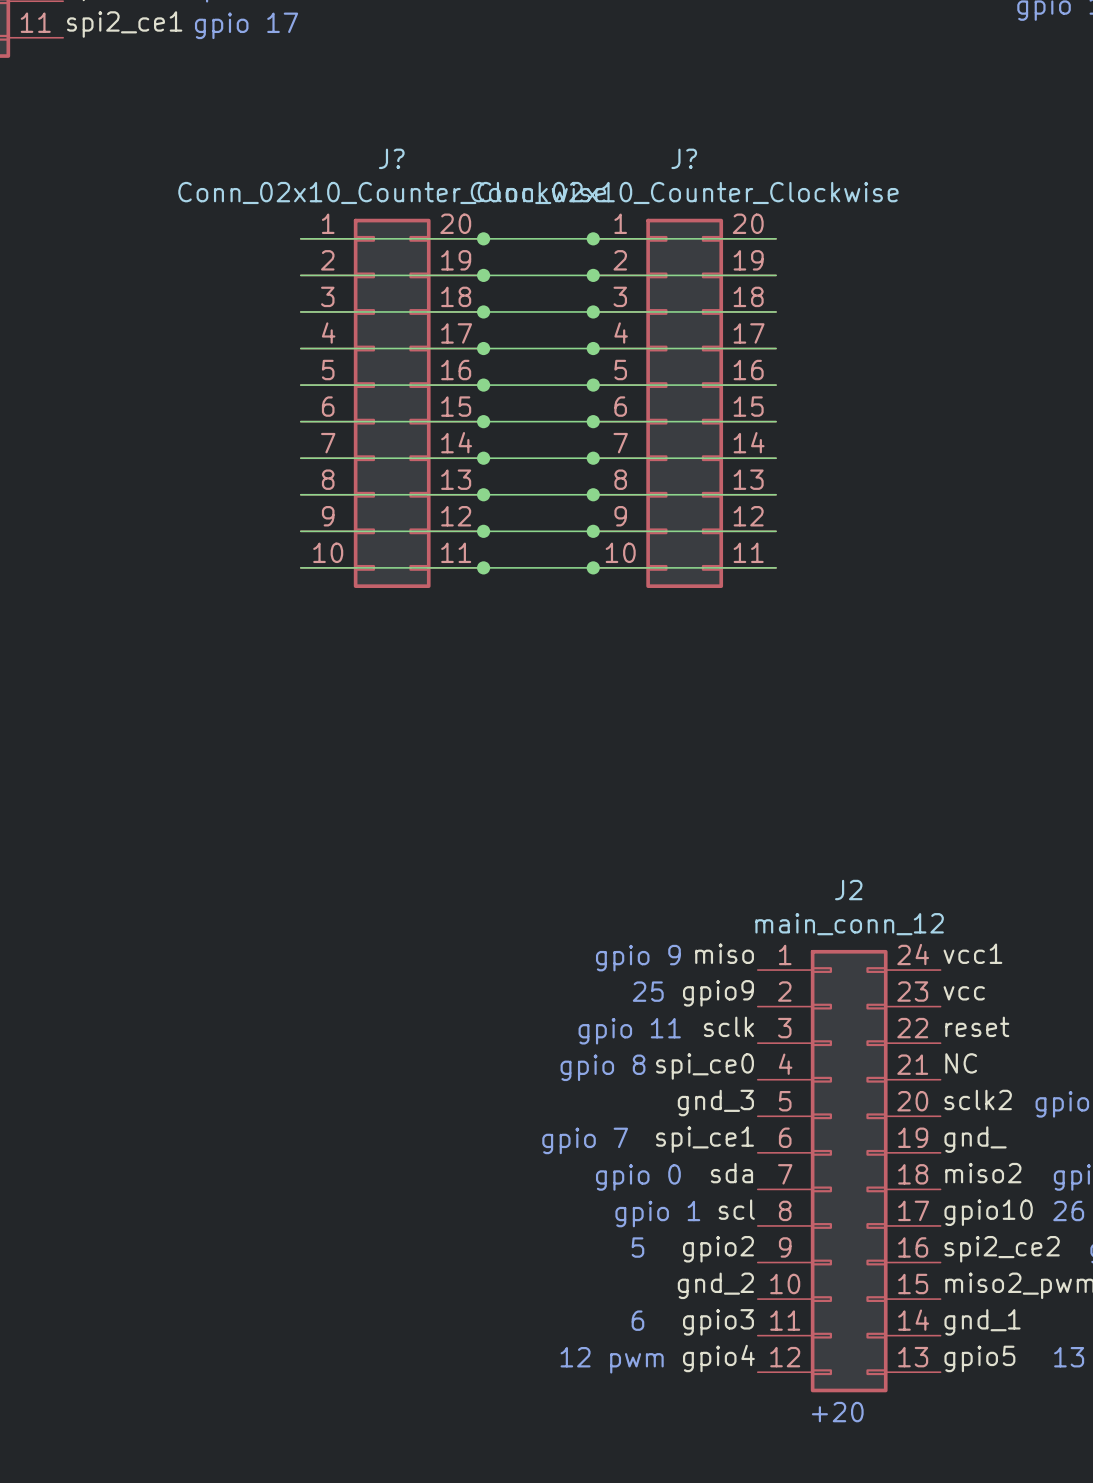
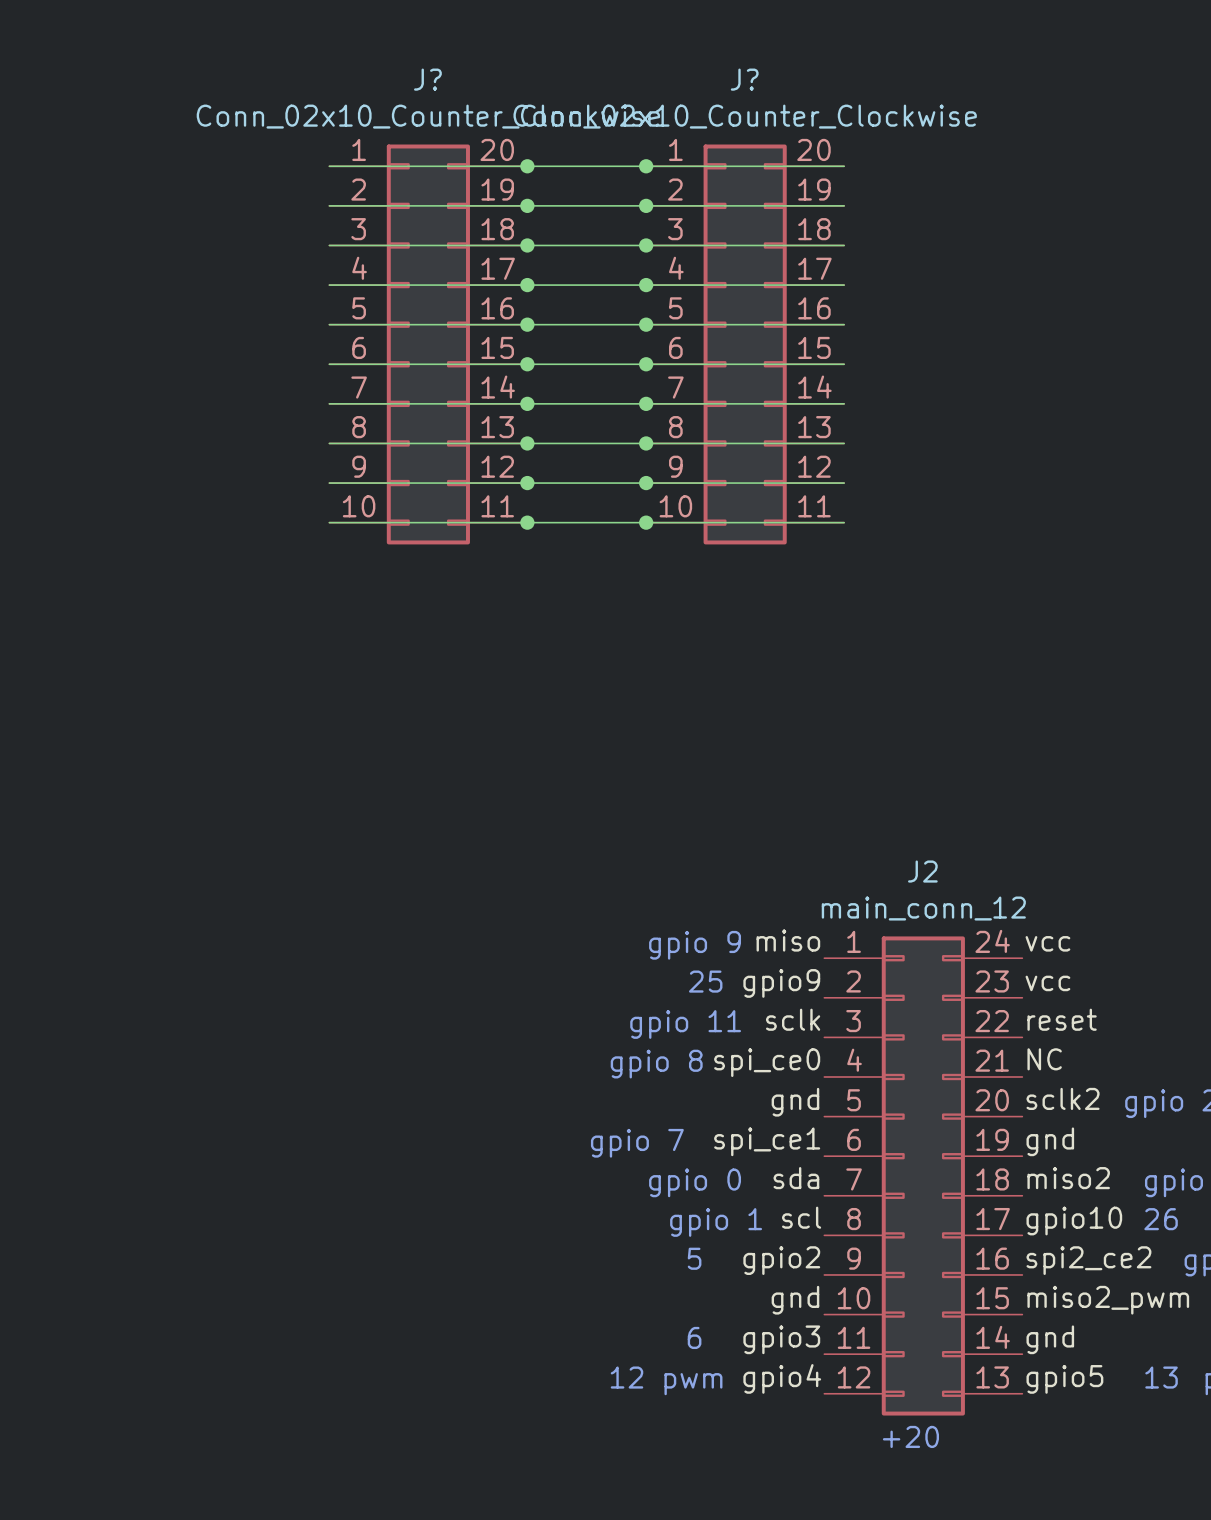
label: vcc1 (972, 953) -> vcc (1047, 943)
label: gnd_3 (715, 1103) -> gnd (795, 1102)
label: gnd_ (975, 1139) -> gnd (1050, 1141)
label: gnd_2 (715, 1285) -> gnd (795, 1300)
label: gnd_1 (982, 1322) -> gnd (1050, 1339)

